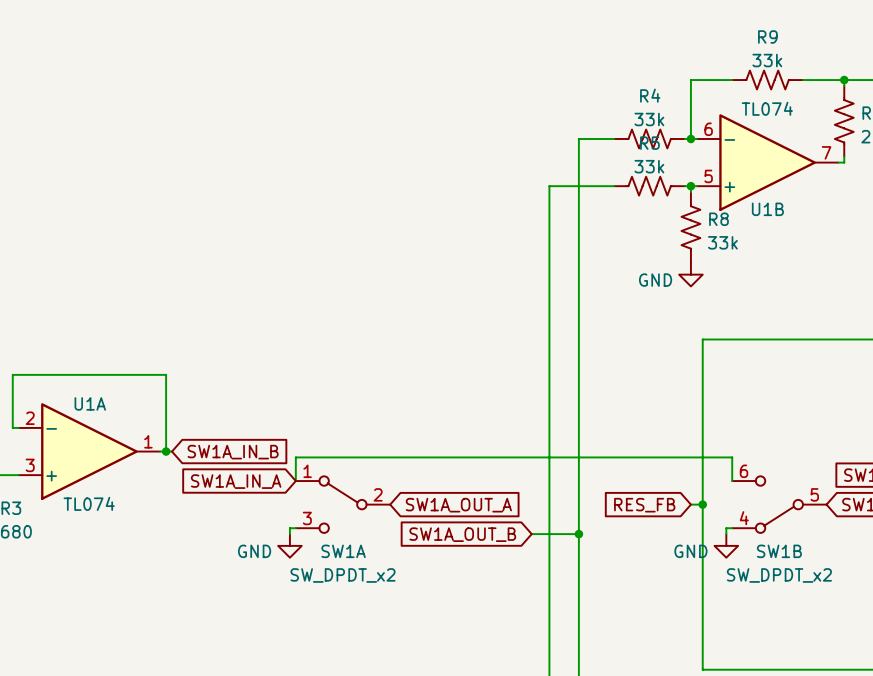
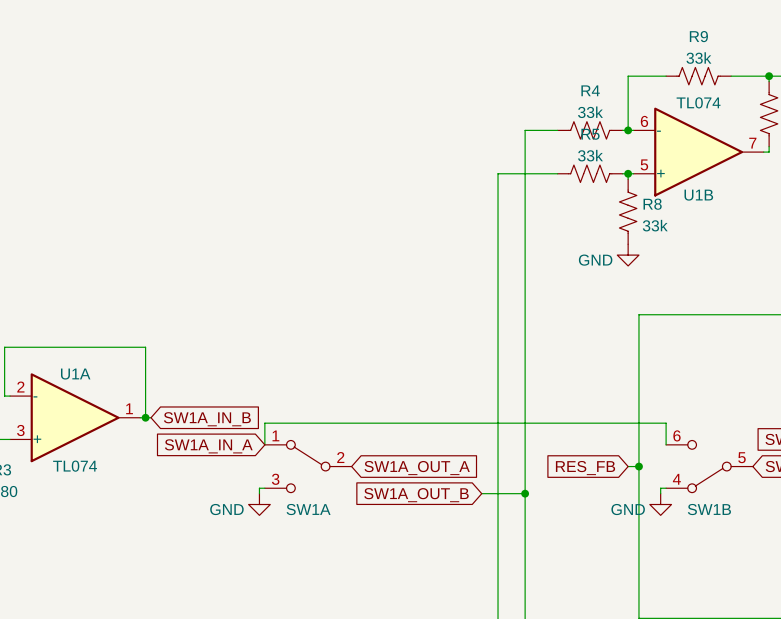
SW1A value: SW_DPDT_x2 (343, 575) -> none
SW1B value: SW_DPDT_x2 (779, 575) -> none

